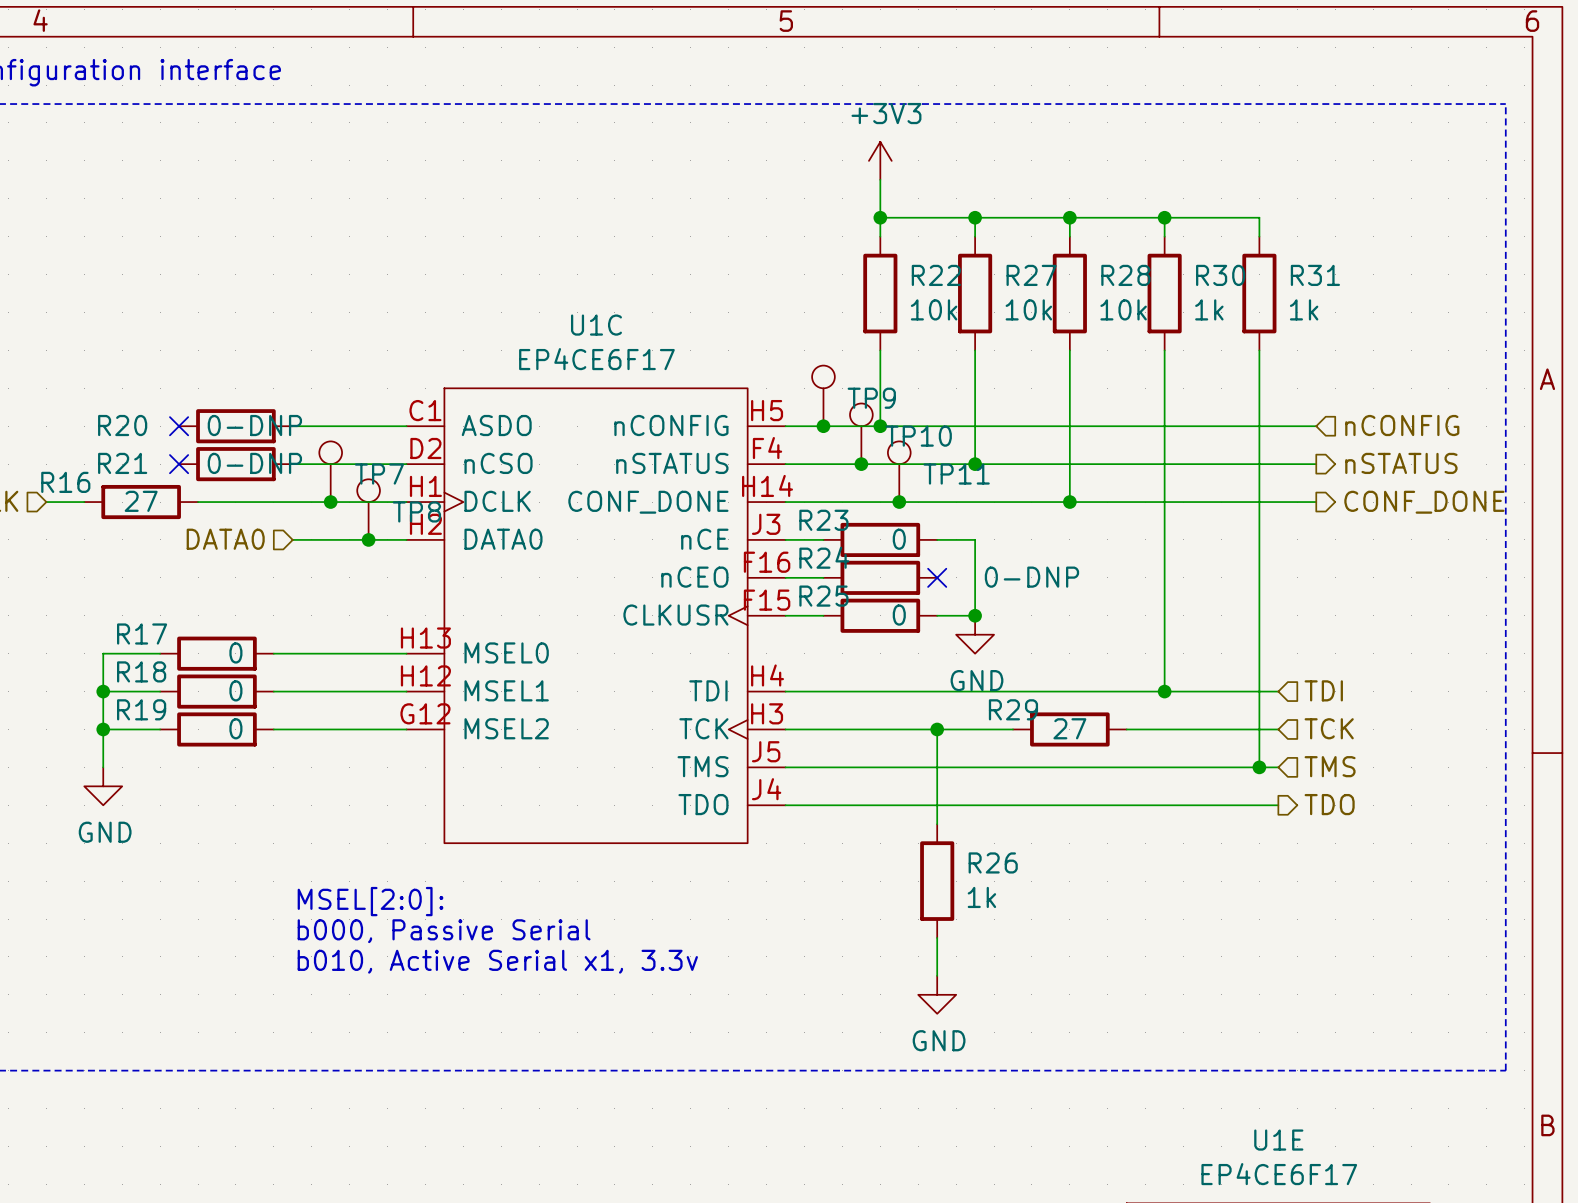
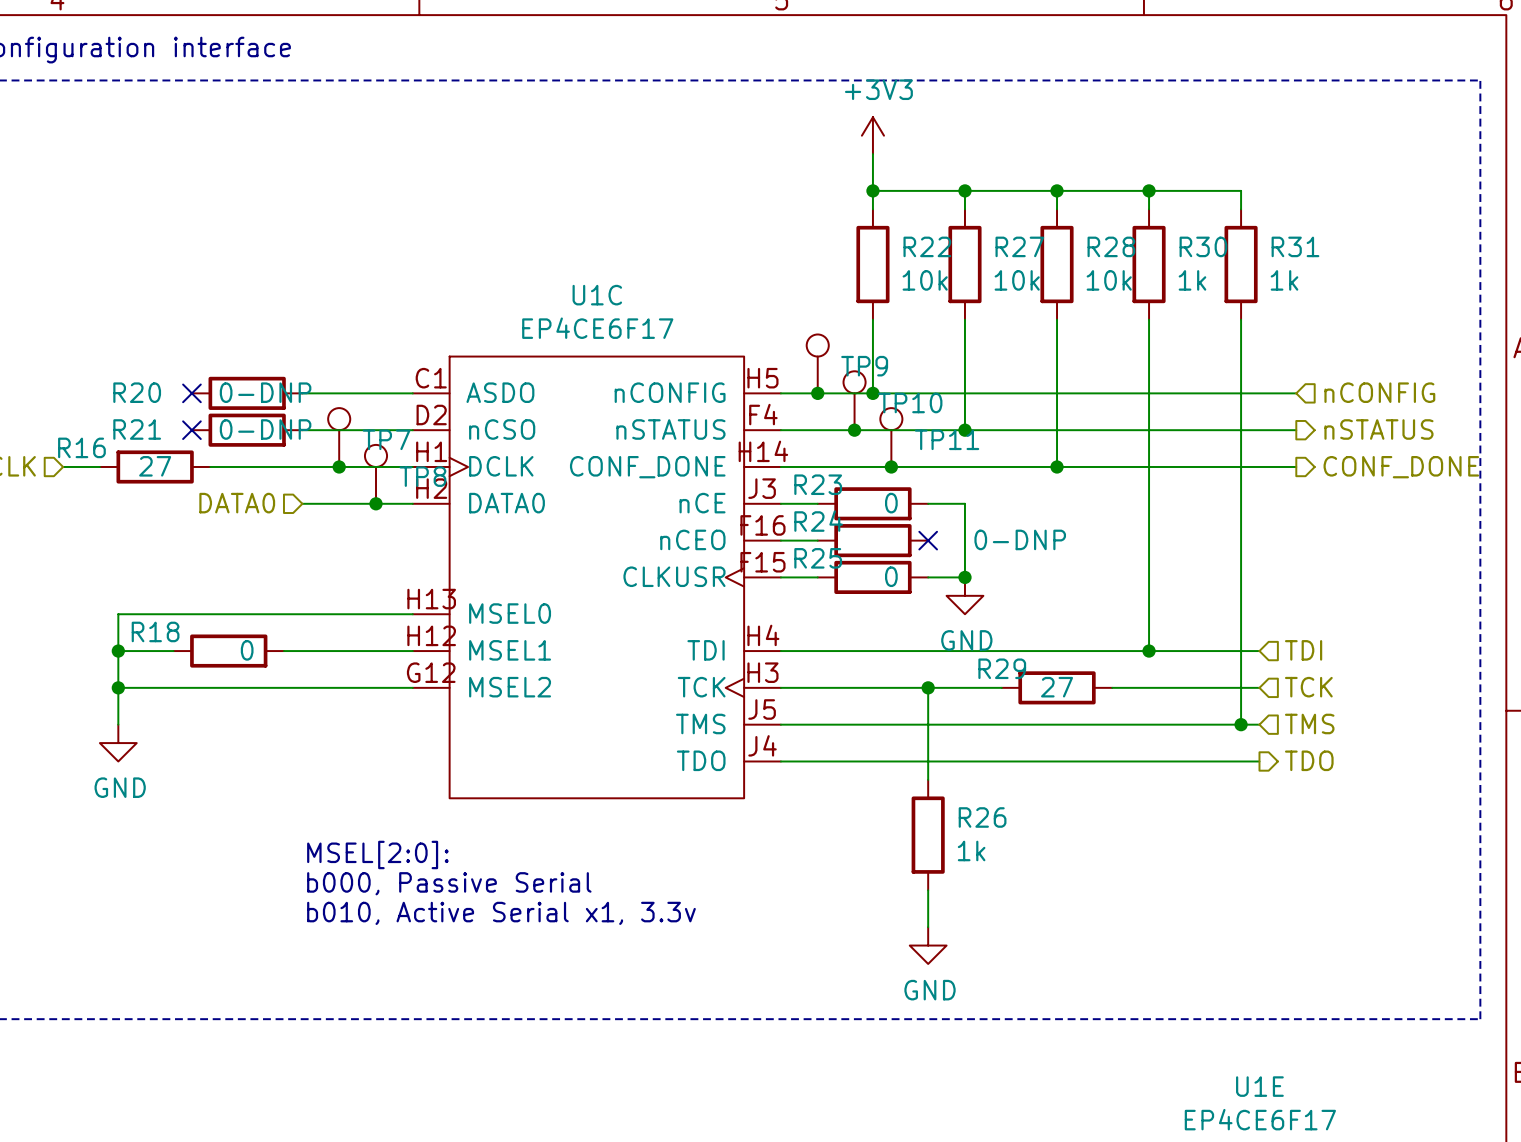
wire: none -> (173, 614) (283, 614)
R17: 0 (216, 653) -> none
wire: none -> (173, 687) (283, 687)
R19: 0 (216, 729) -> none

